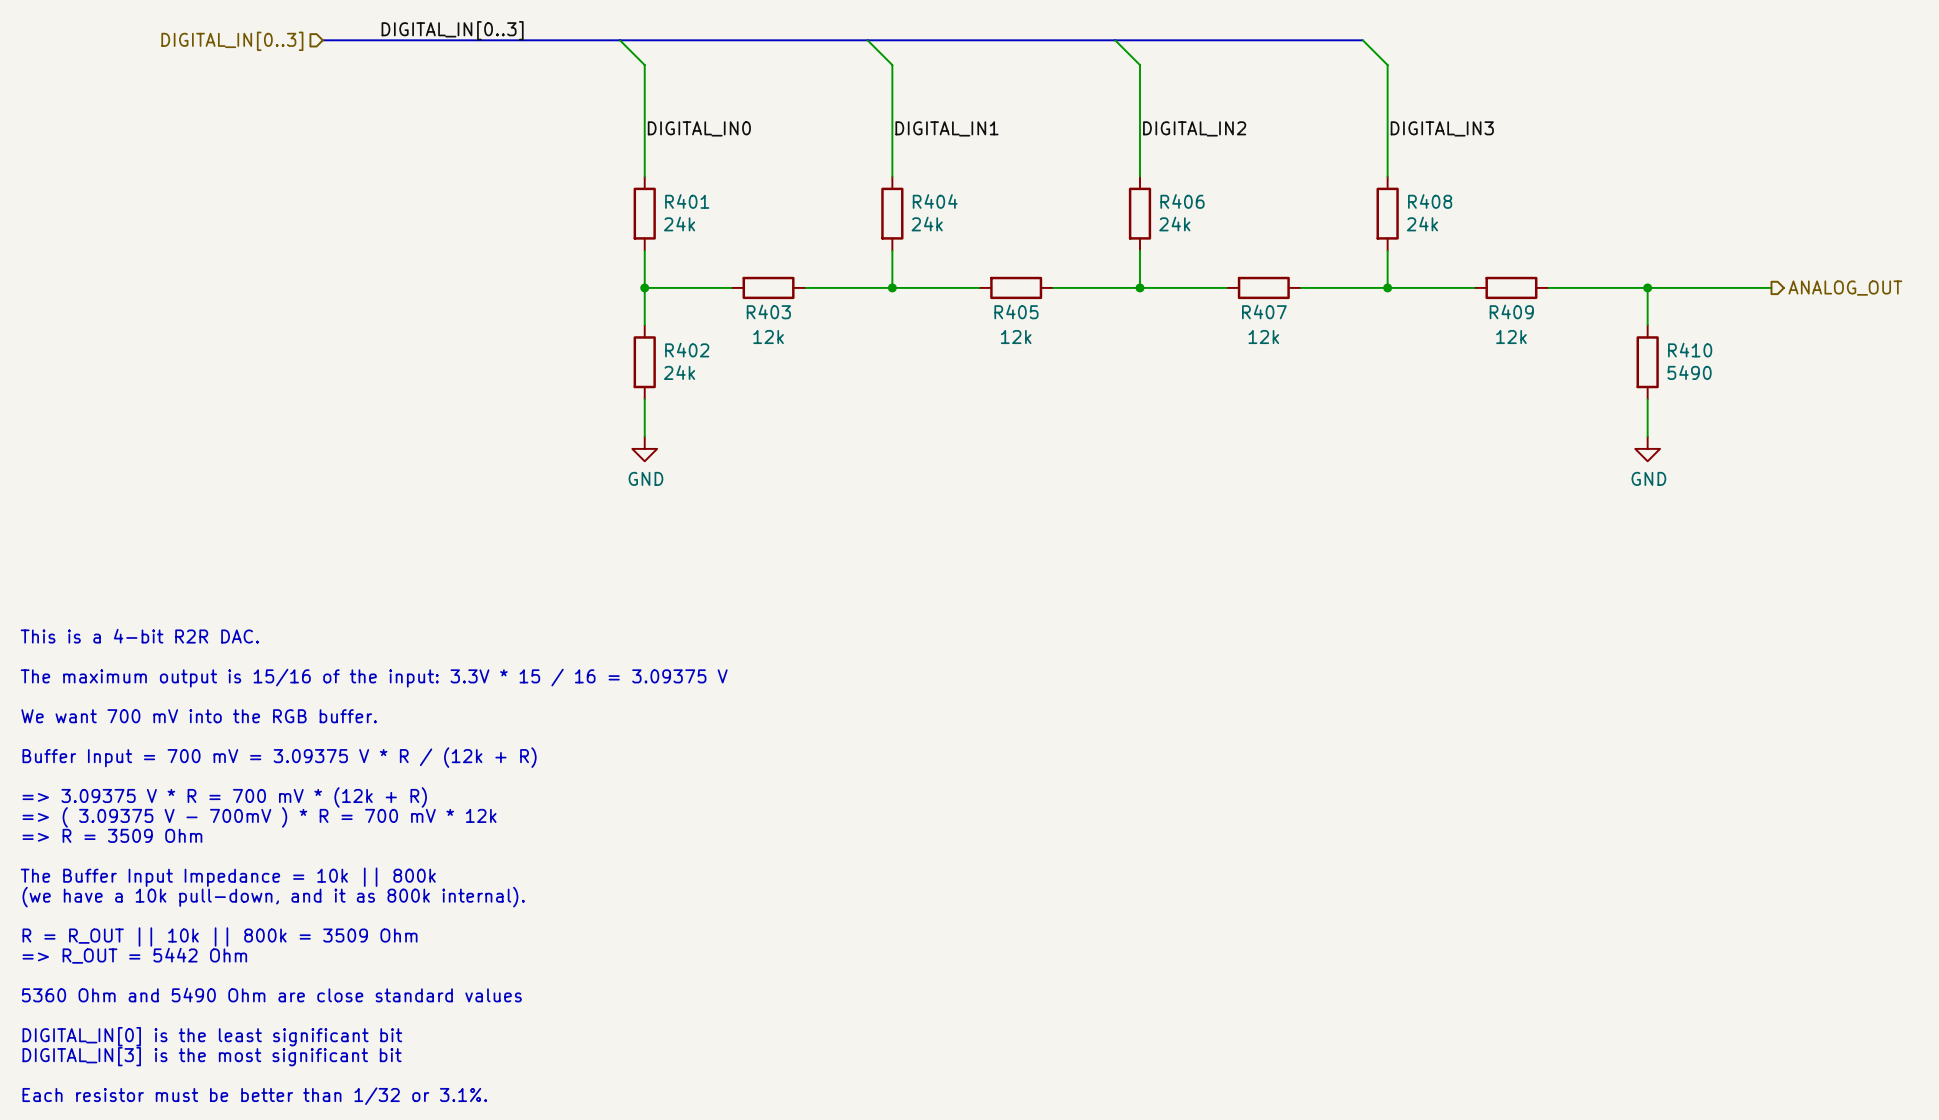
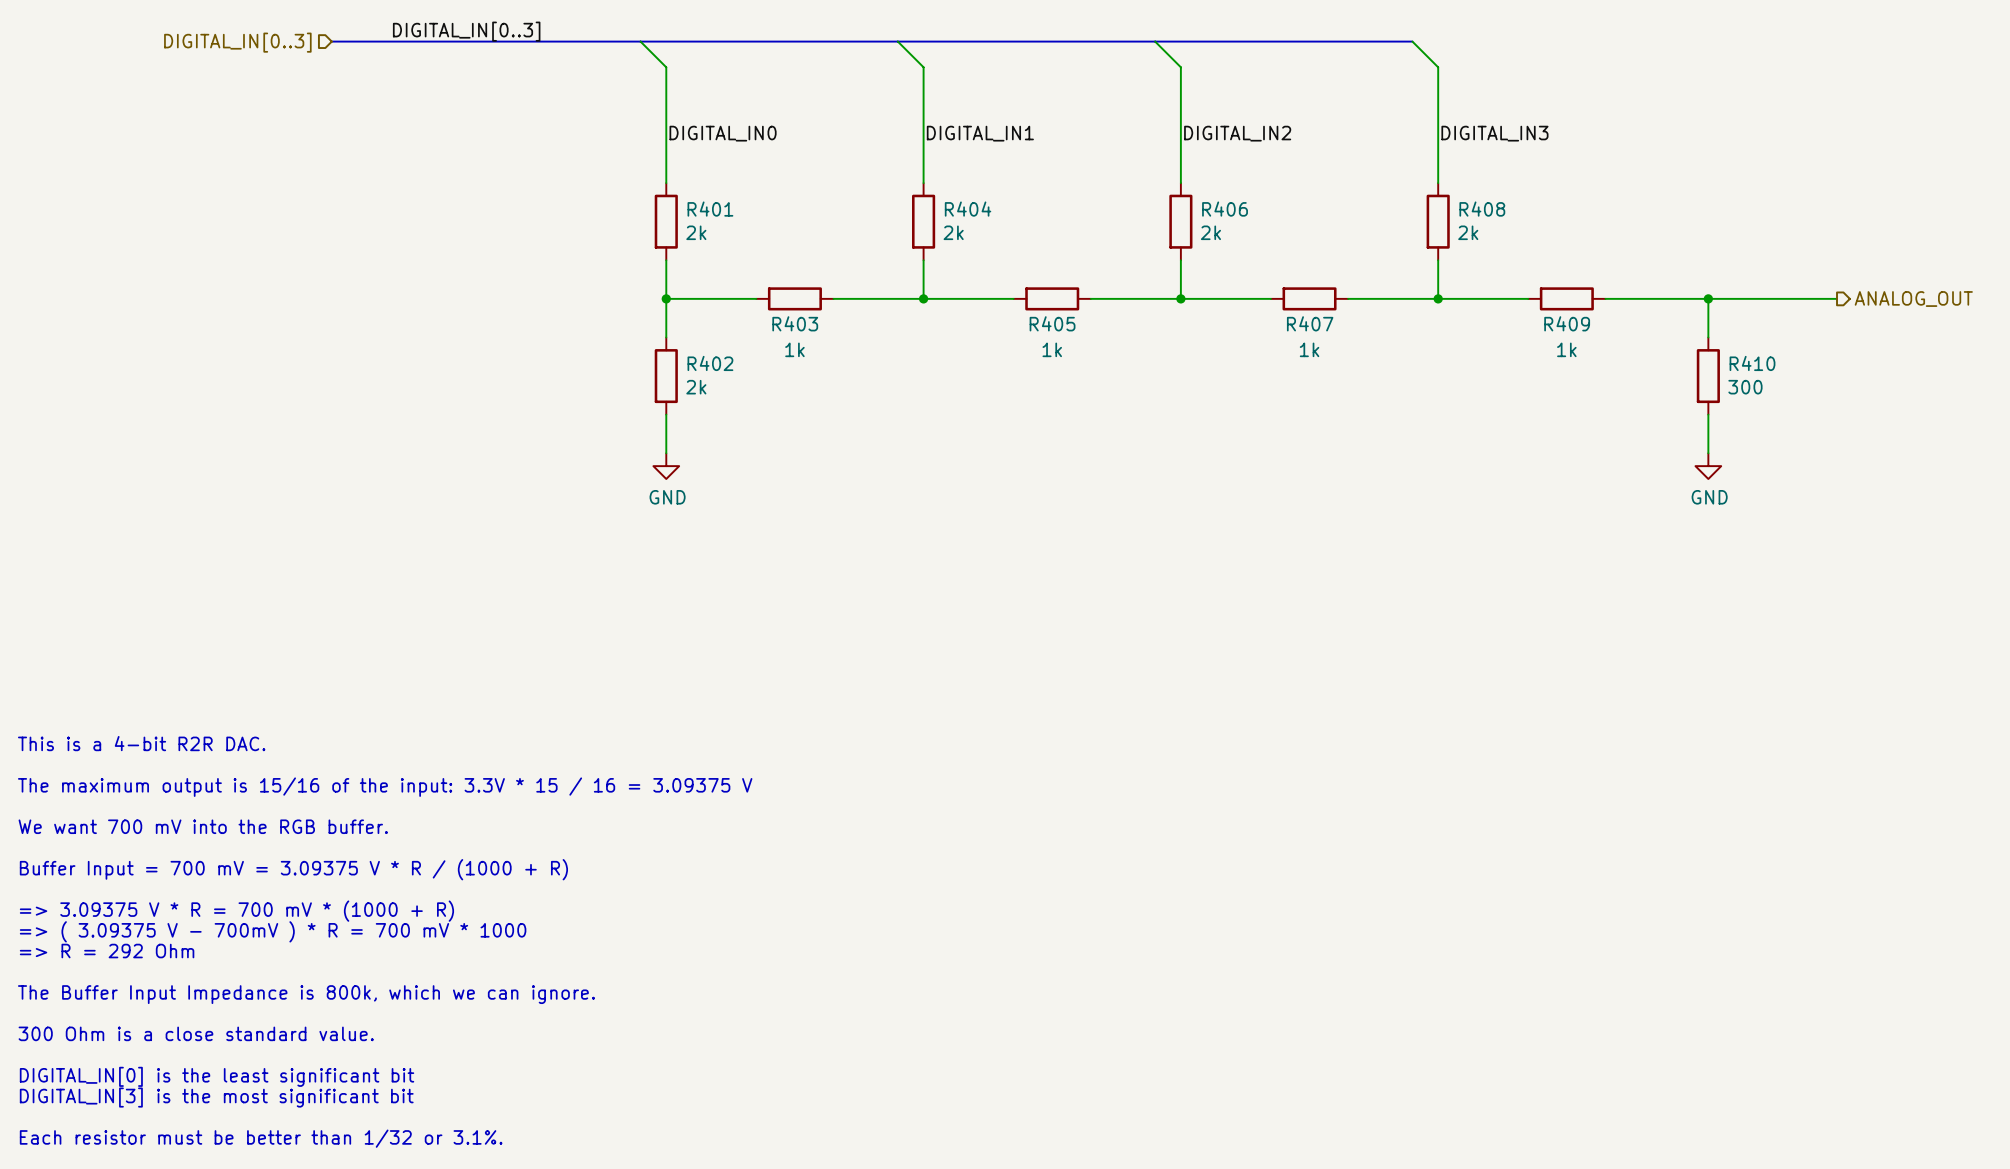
R401 value: 24k (679, 224) -> 2k (696, 232)
R404 value: 24k (927, 224) -> 2k (953, 232)
R406 value: 24k (1174, 224) -> 2k (1210, 232)
R408 value: 24k (1422, 224) -> 2k (1468, 232)
R403 value: 12k (768, 337) -> 1k (794, 349)
R405 value: 12k (1016, 337) -> 1k (1052, 349)
R407 value: 12k (1263, 337) -> 1k (1309, 349)
R409 value: 12k (1511, 337) -> 1k (1566, 349)
R402 value: 24k (679, 372) -> 2k (696, 387)
R410 value: 5490 (1689, 372) -> 300 (1745, 387)
text: This is a 4-bit R2R DAC. (139, 636) -> none
text: The maximum output is 15/16 of the input: 3.3V * 15 / 16 = 3.09375 V (374, 678) -> none
text: We want 700 mV into the RGB buffer. (199, 716) -> This is a 4-bit R2R DAC. (141, 743)
text: Buffer Input = 700 mV = 3.09375 V * R / (12k + R) (279, 757) -> The maximum output is 15/16 of the input: 3.3V * 15 / 16 = 3.09375 V (385, 787)
text: => 3.09375 V * R = 700 mV * (12k + R) (224, 797) -> We want 700 mV into the RGB buffer. (203, 826)
text: => ( 3.09375 V - 700mV ) * R = 700 mV * 12k (259, 817) -> none
text: => R = 3509 Ohm (112, 835) -> Buffer Input = 700 mV = 3.09375 V * R / (1000 + R) (293, 869)
text: The Buffer Input Impedance = 10k || 800k (228, 877) -> => 3.09375 V * R = 700 mV * (1000 + R) (236, 911)
text: (we have a 10k pull-down, and it as 800k internal). (273, 897) -> => ( 3.09375 V - 700mV ) * R = 700 mV * 1000 (273, 931)
text: none -> => R = 292 Ohm (107, 951)
text: R = R_OUT || 10k || 800k = 3509 Ohm (220, 937) -> none
text: => R_OUT = 5442 Ohm (134, 955) -> The Buffer Input Impedance is 800k, which we can ignore. (306, 994)
text: 5360 Ohm and 5490 Ohm are close standard values (271, 995) -> 300 Ohm is a close standard value. (196, 1033)

